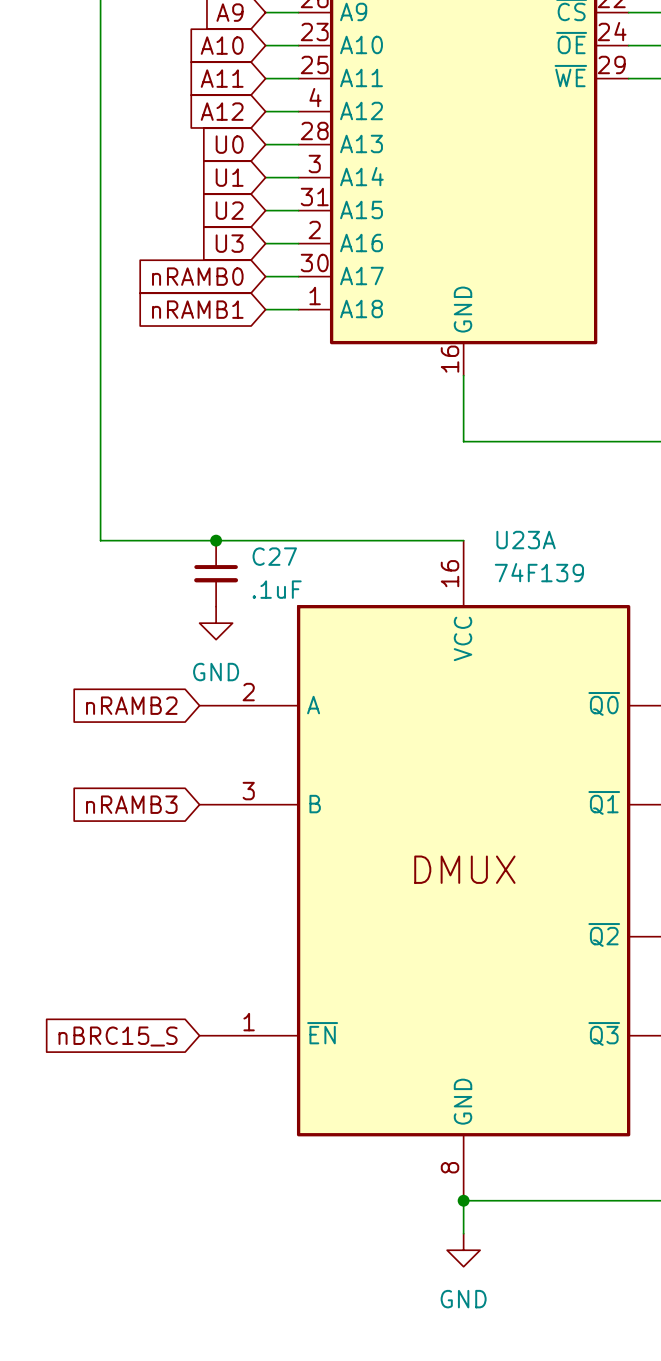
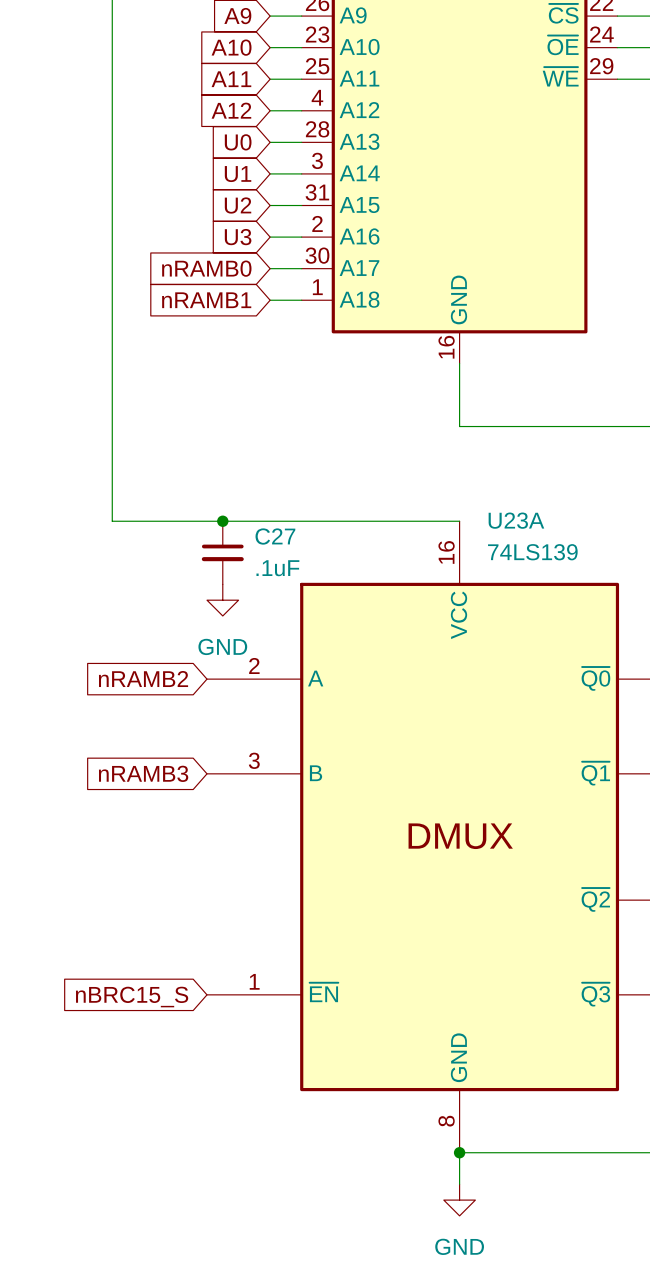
U23A value: 74F139 (539, 572) -> 74LS139 (532, 552)

